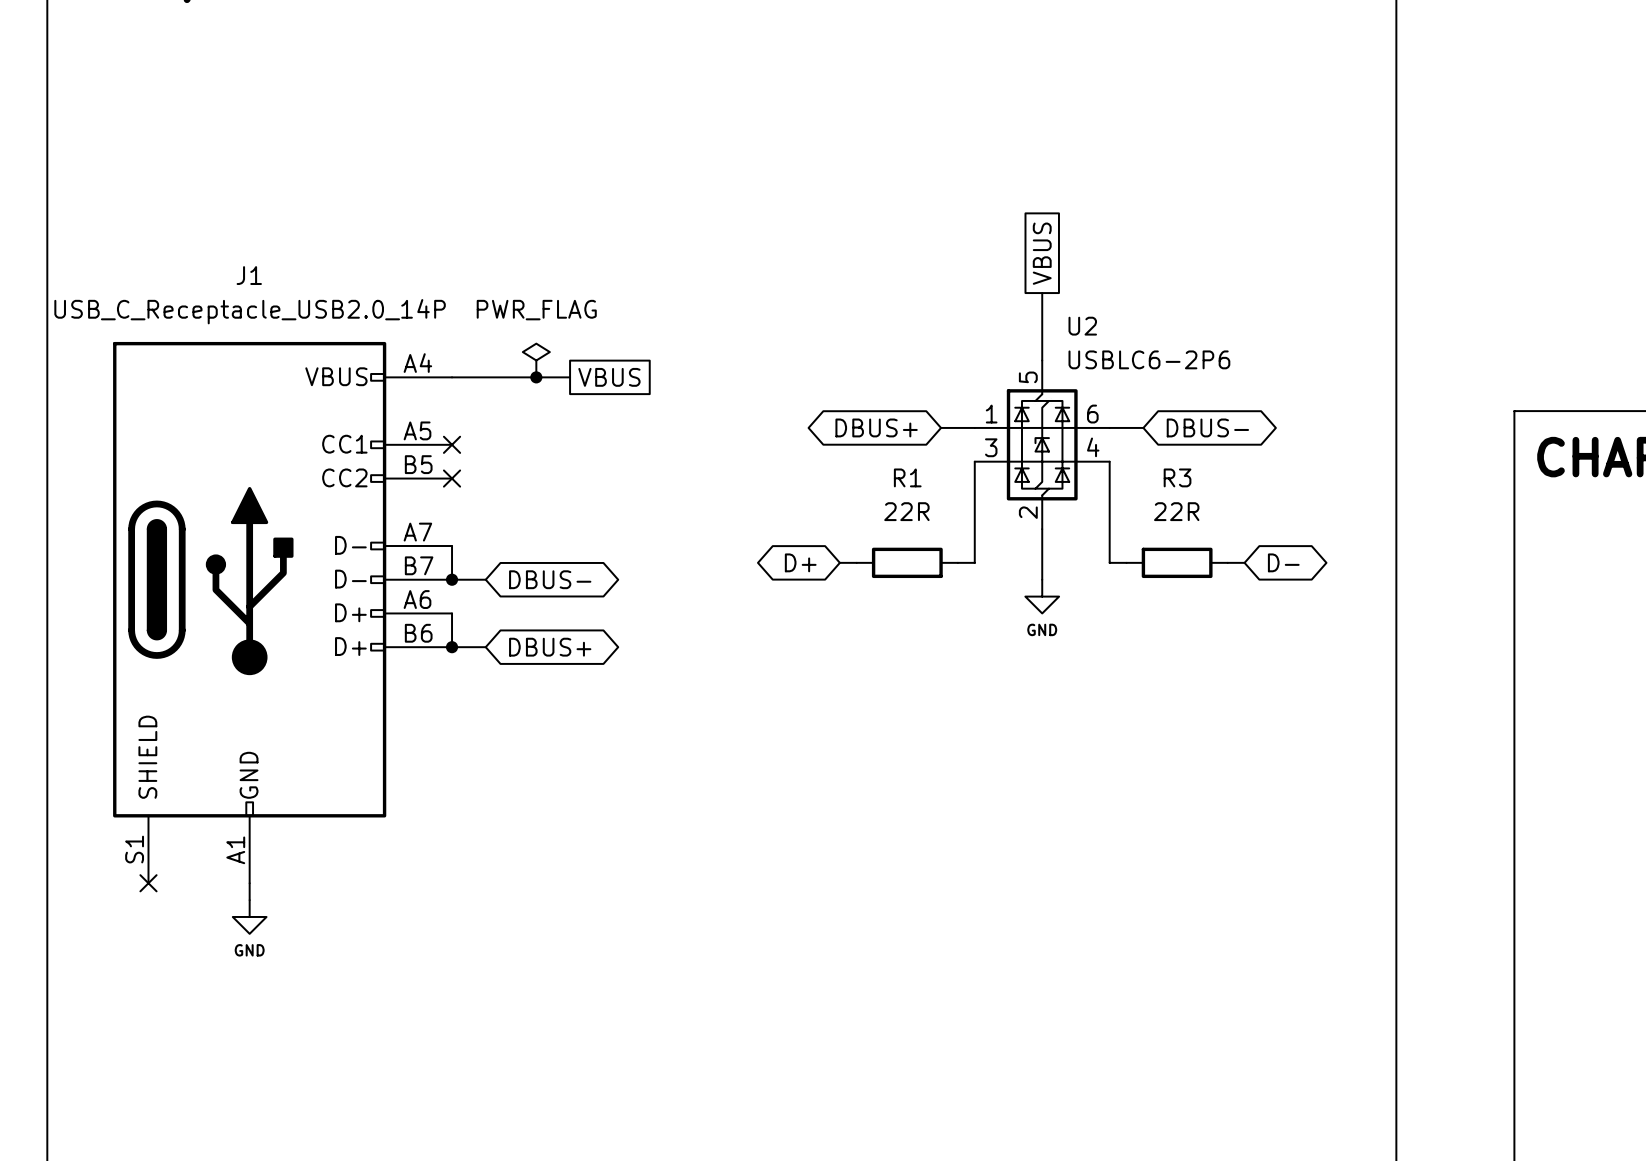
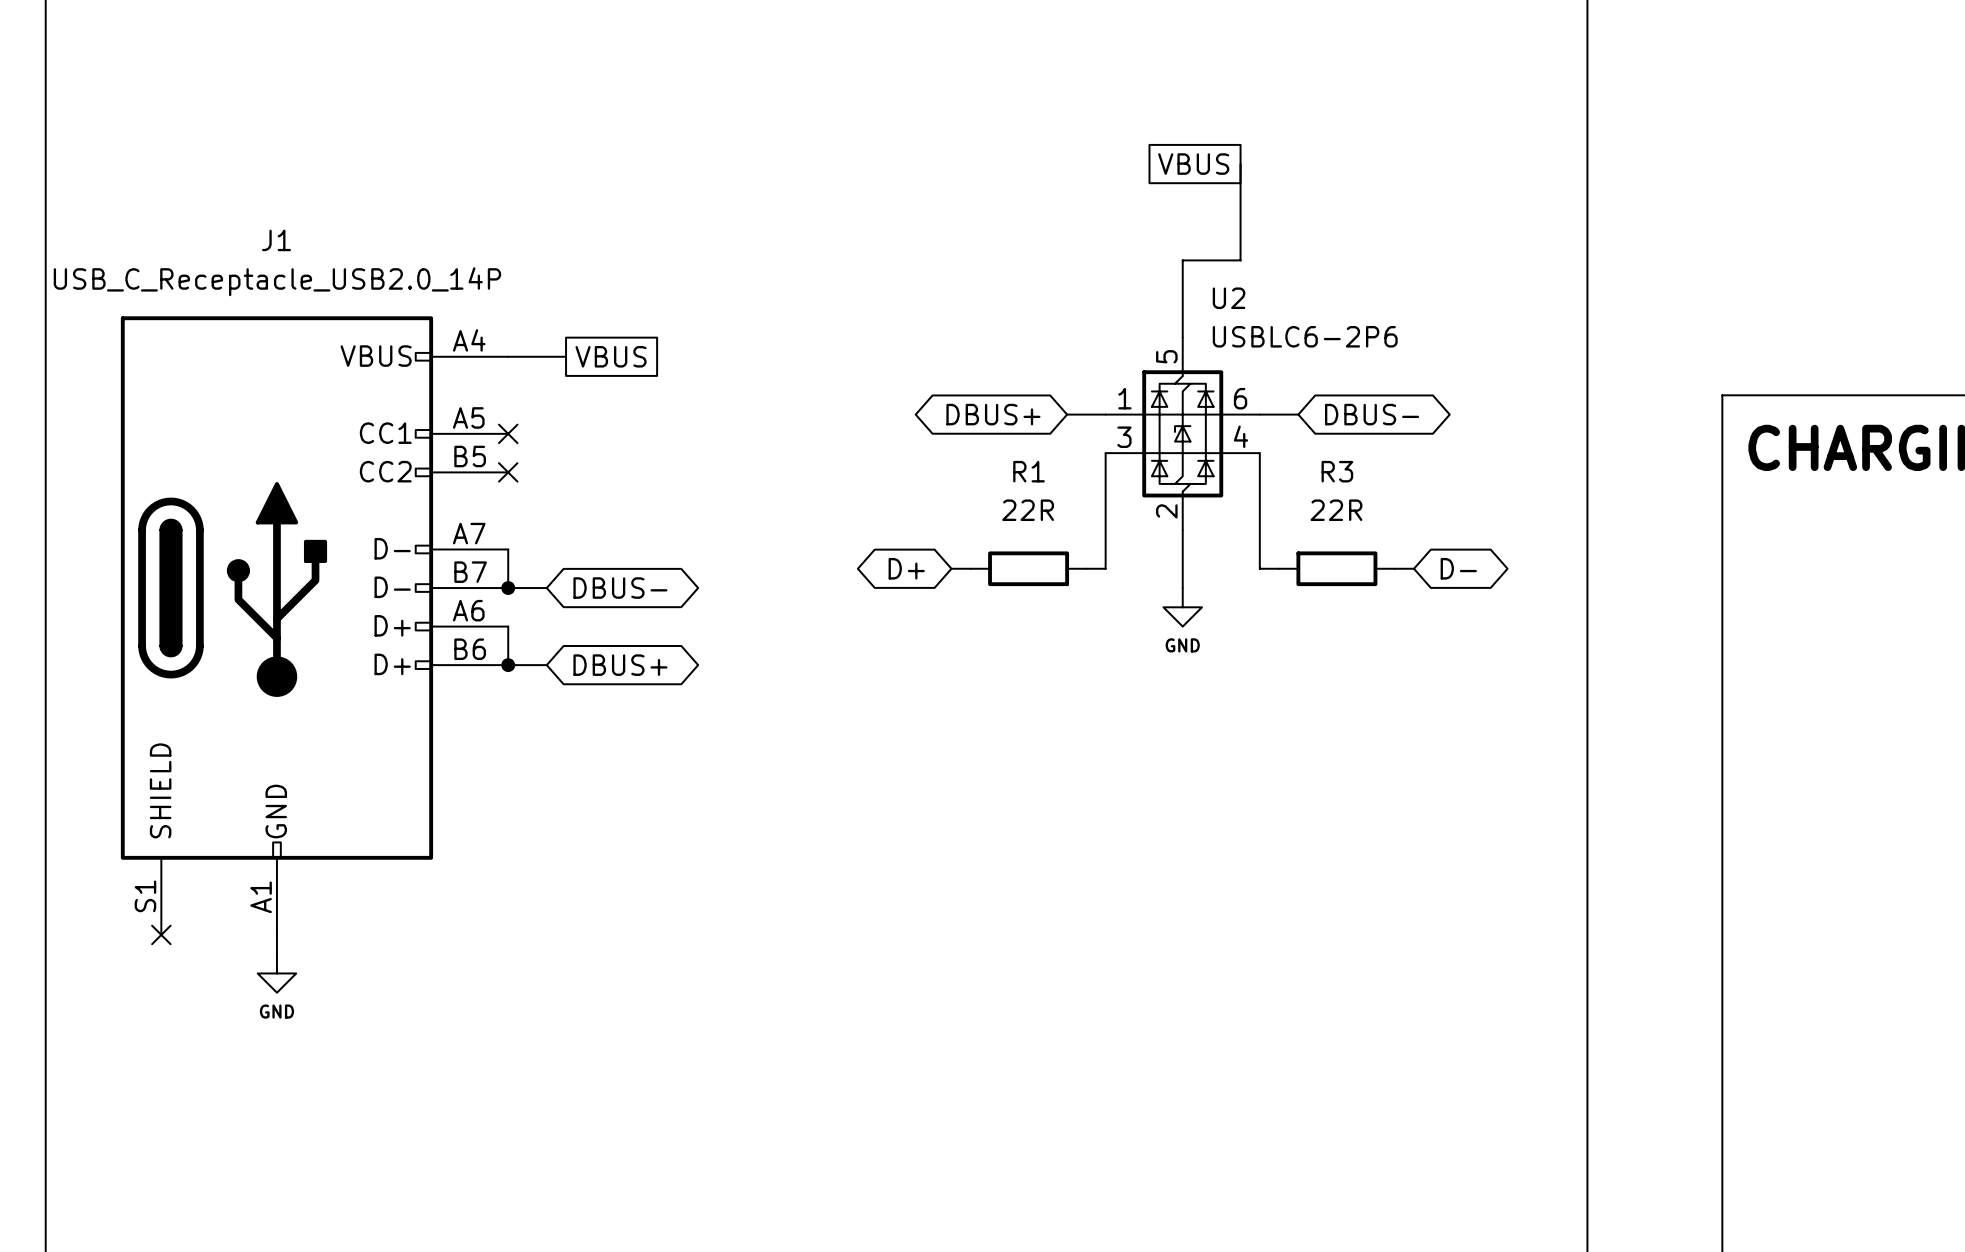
wire: none -> (1240, 164) (1240, 260) (1182, 260)
global label rotation: 0° (1042, 253) -> 90° counterclockwise (1193, 164)
power symbol: PWR_FLAG (536, 360) -> none
wire: (502, 377) (570, 377) -> none
junction: (536, 377) -> none
global label position: VBUS (609, 377) -> VBUS (611, 356)

